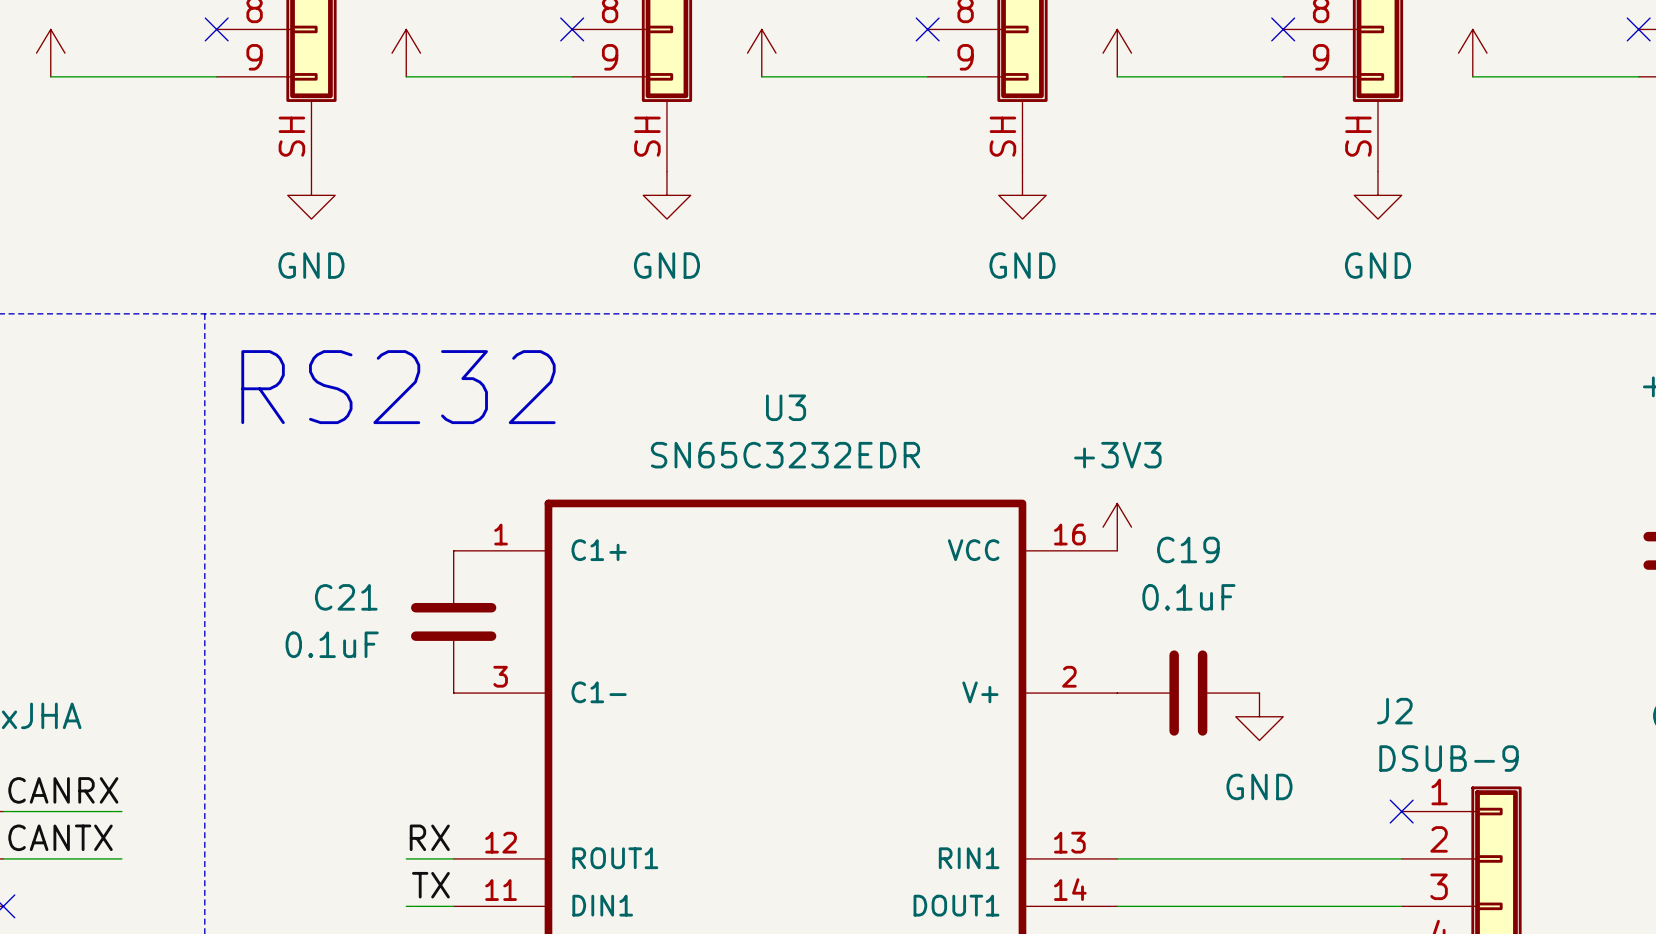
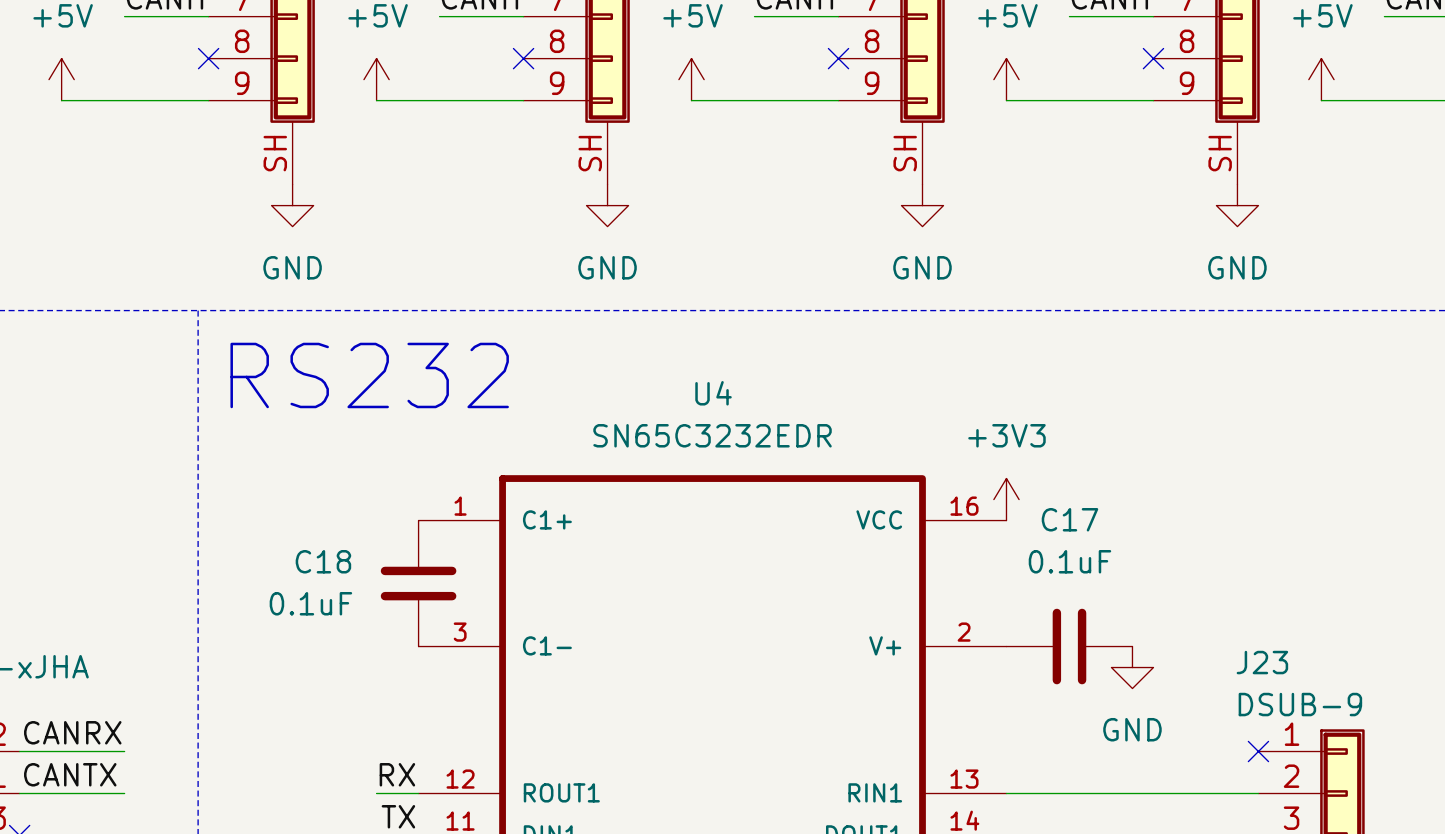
U3 name: U3 (786, 407) -> U4 (713, 393)
C19 name: C19 (1188, 549) -> C17 (1069, 519)
C21 name: C21 (346, 597) -> C18 (323, 561)
J2 name: J2 (1394, 711) -> J23 (1262, 662)

